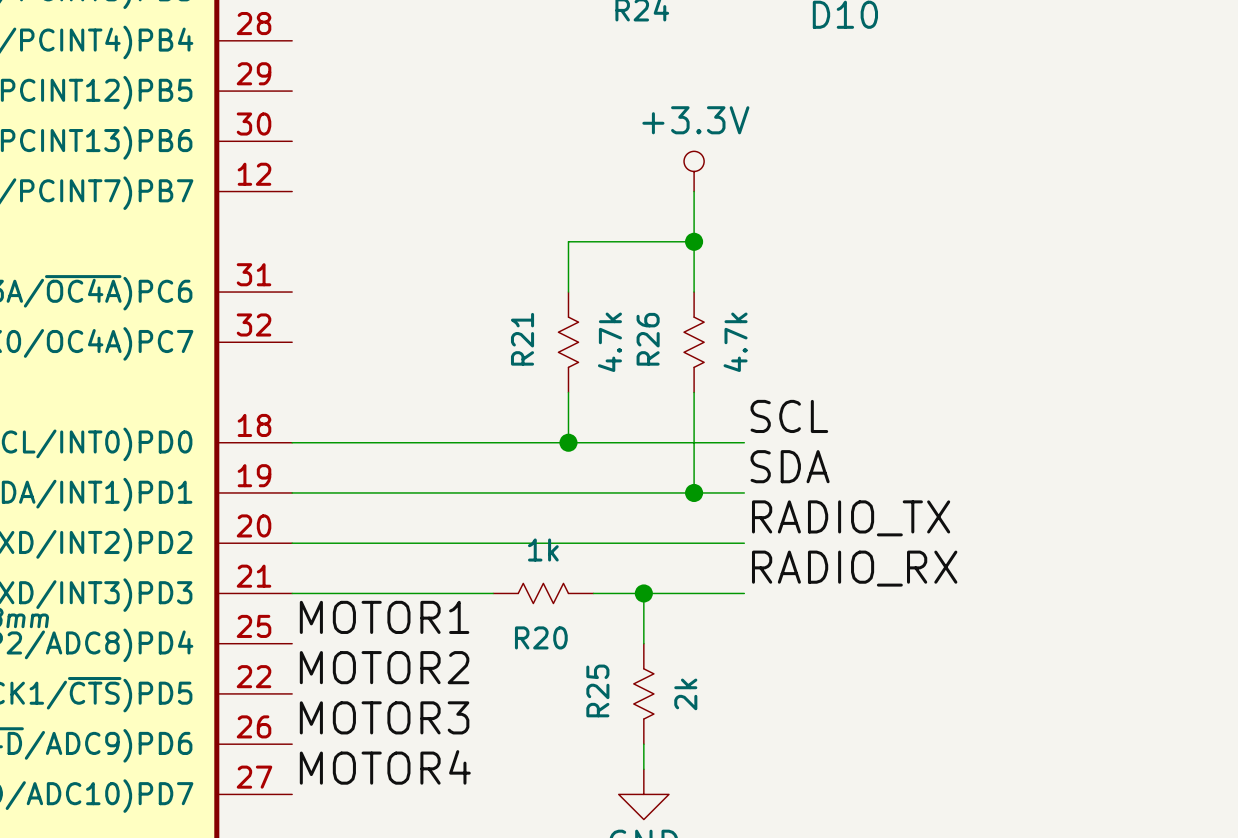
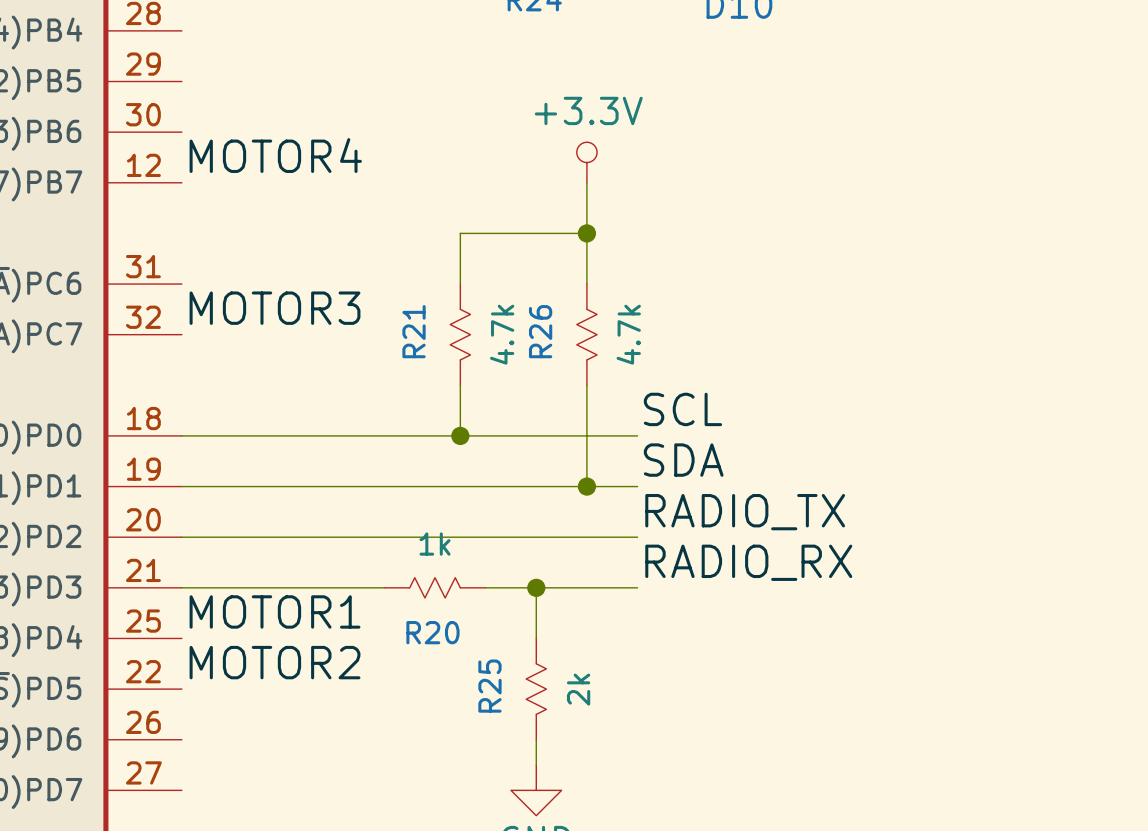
label: none -> MOTOR4 (275, 155)
label position: MOTOR3 (384, 717) -> MOTOR3 (275, 308)
label: MOTOR4 (385, 767) -> none

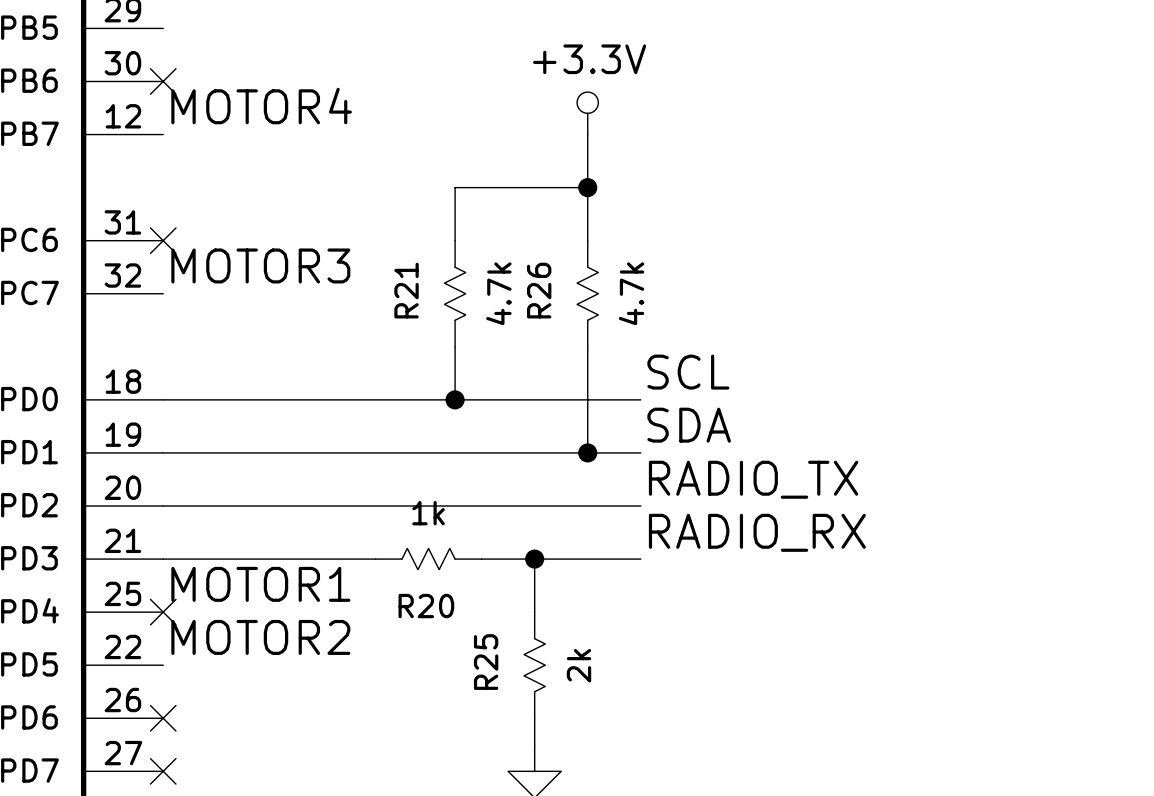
no-connect mark: none -> (163, 81)
no-connect mark: none -> (163, 240)
no-connect mark: none -> (163, 612)
no-connect mark: none -> (163, 718)
no-connect mark: none -> (163, 771)

